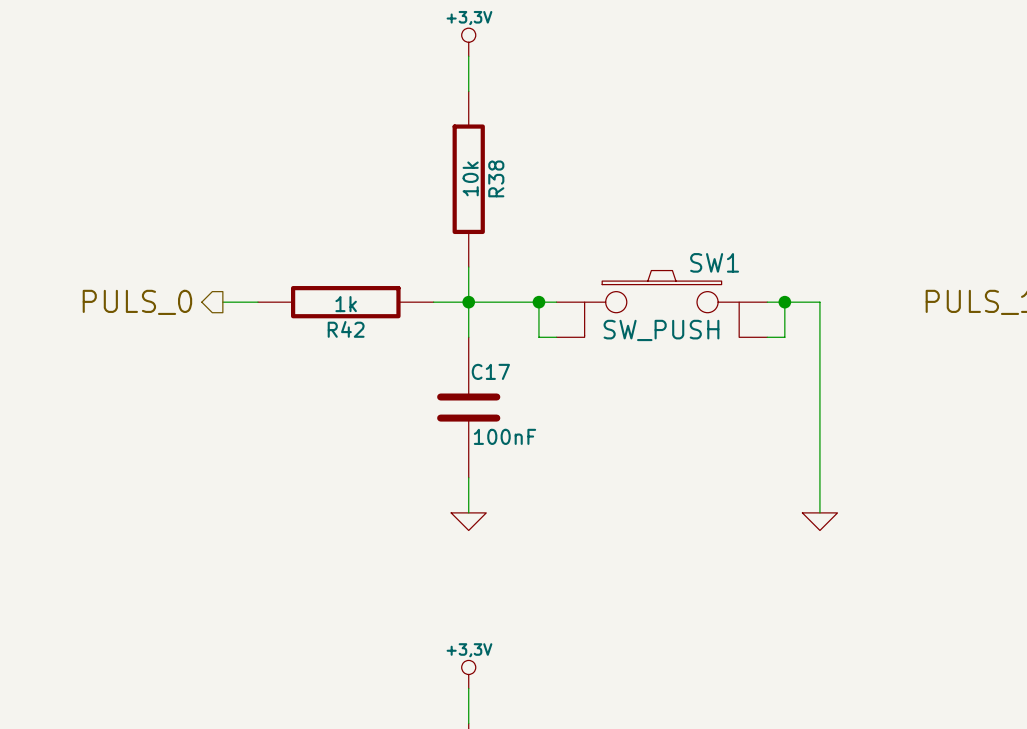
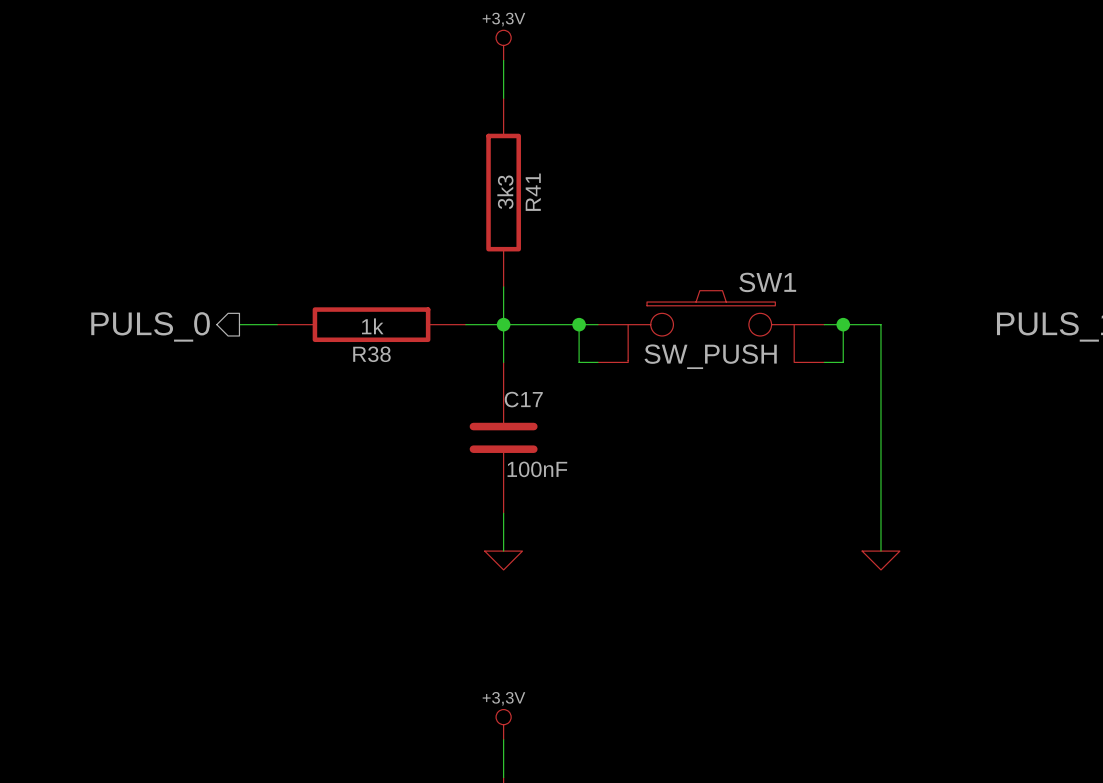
R38 value: 10k (470, 178) -> 3k3 (505, 192)
R38 name: R38 (496, 178) -> R41 (533, 192)
R42 name: R42 (346, 329) -> R38 (371, 354)

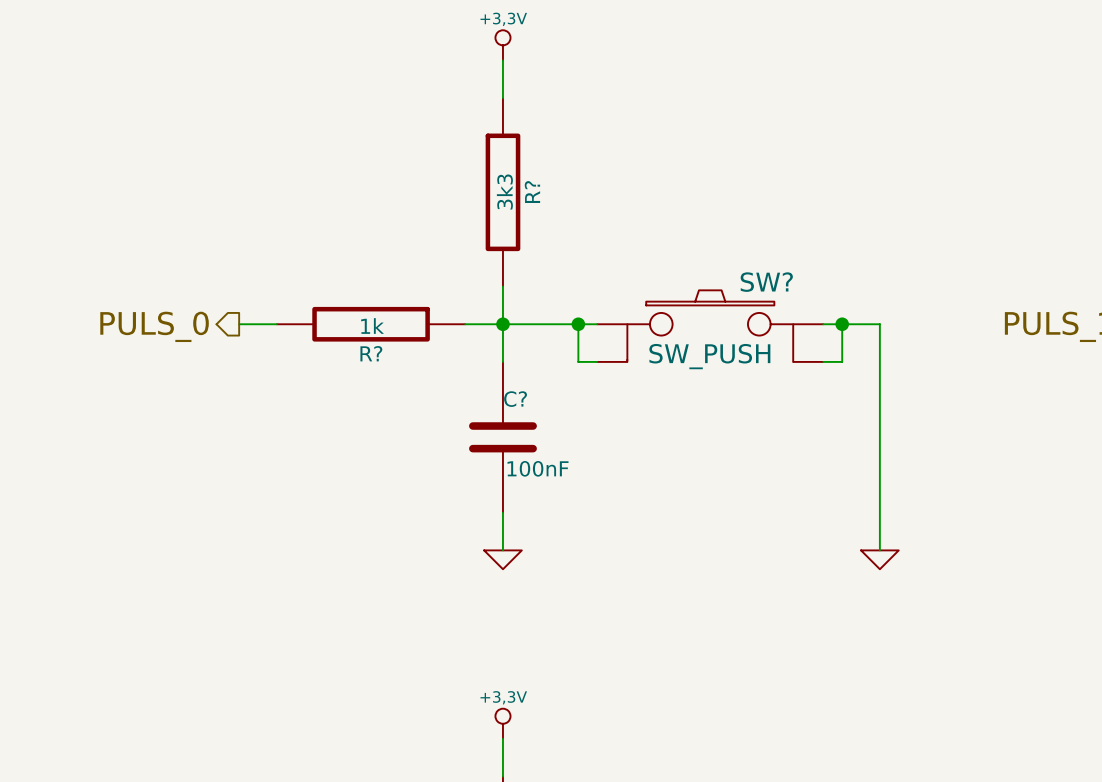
R41 name: R41 (533, 192) -> R? (532, 192)
SW1 name: SW1 (767, 282) -> SW? (766, 282)
R38 name: R38 (371, 354) -> R? (371, 353)
C17 name: C17 (523, 399) -> C? (515, 399)

